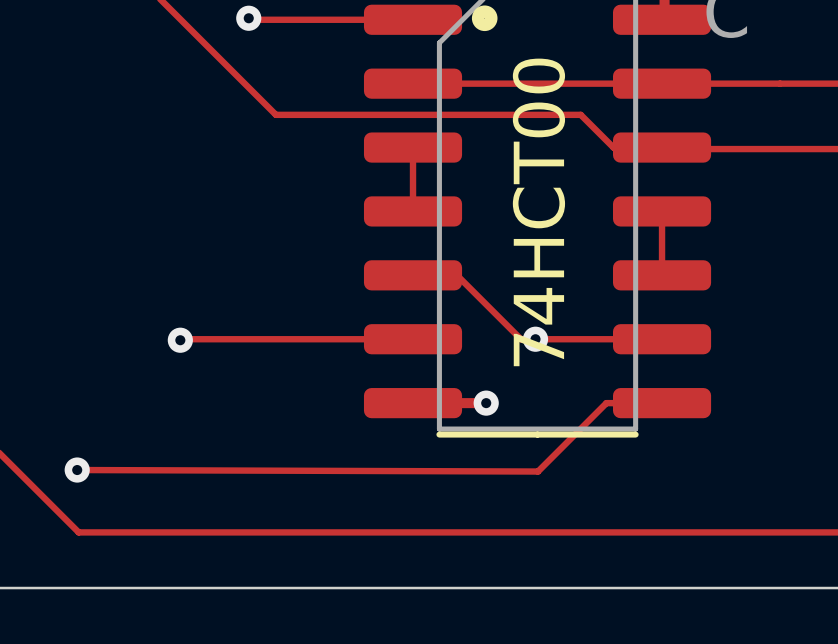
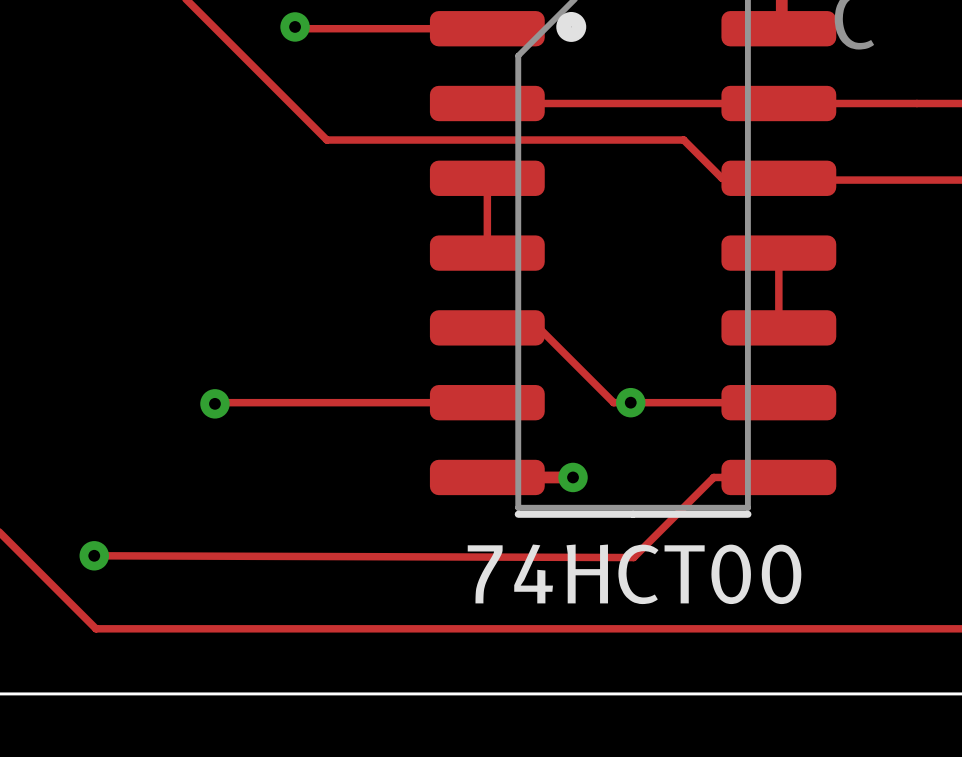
part value rotation: 0° (538, 212) -> 90° clockwise (634, 574)

